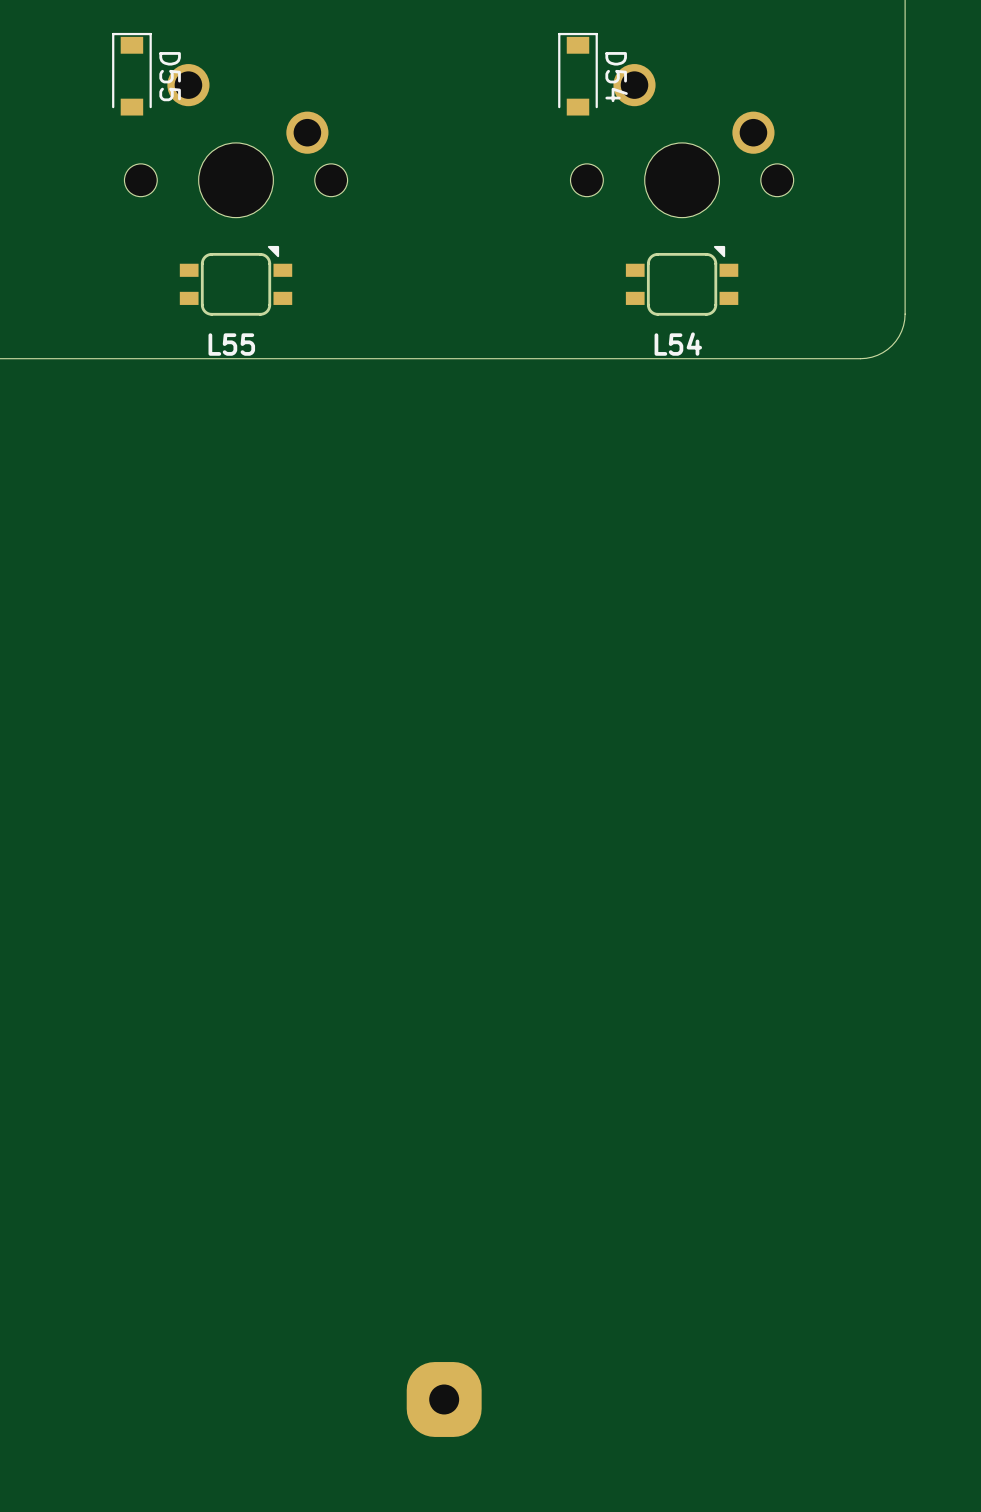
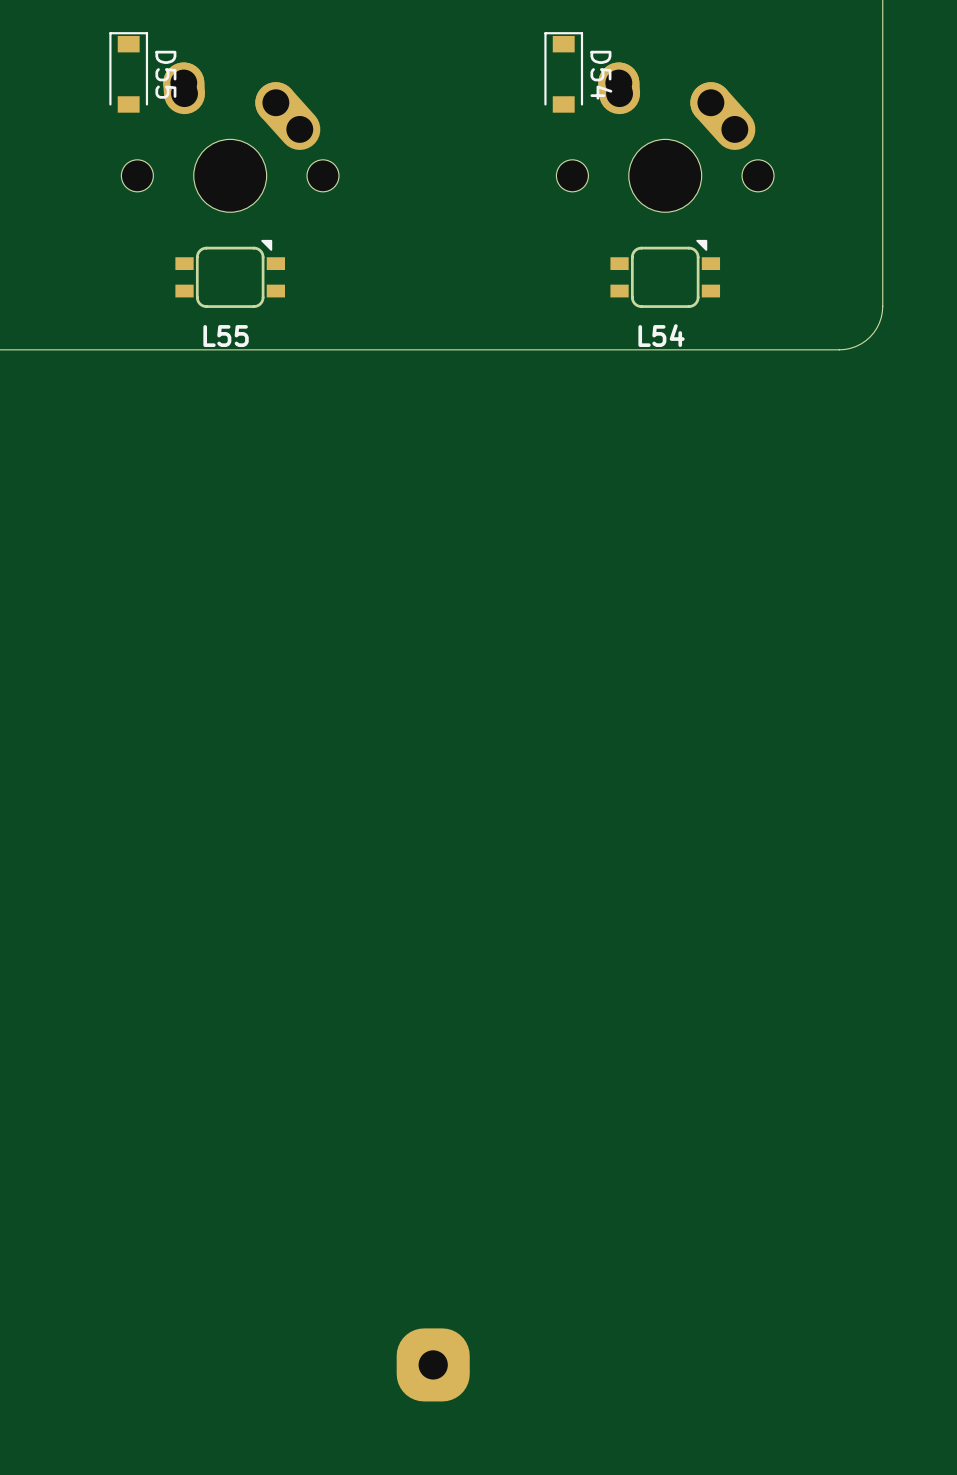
part footprint: [124, 64, 348, 218] -> [121, 62, 339, 213]
part footprint: [570, 64, 794, 218] -> [556, 62, 775, 213]

